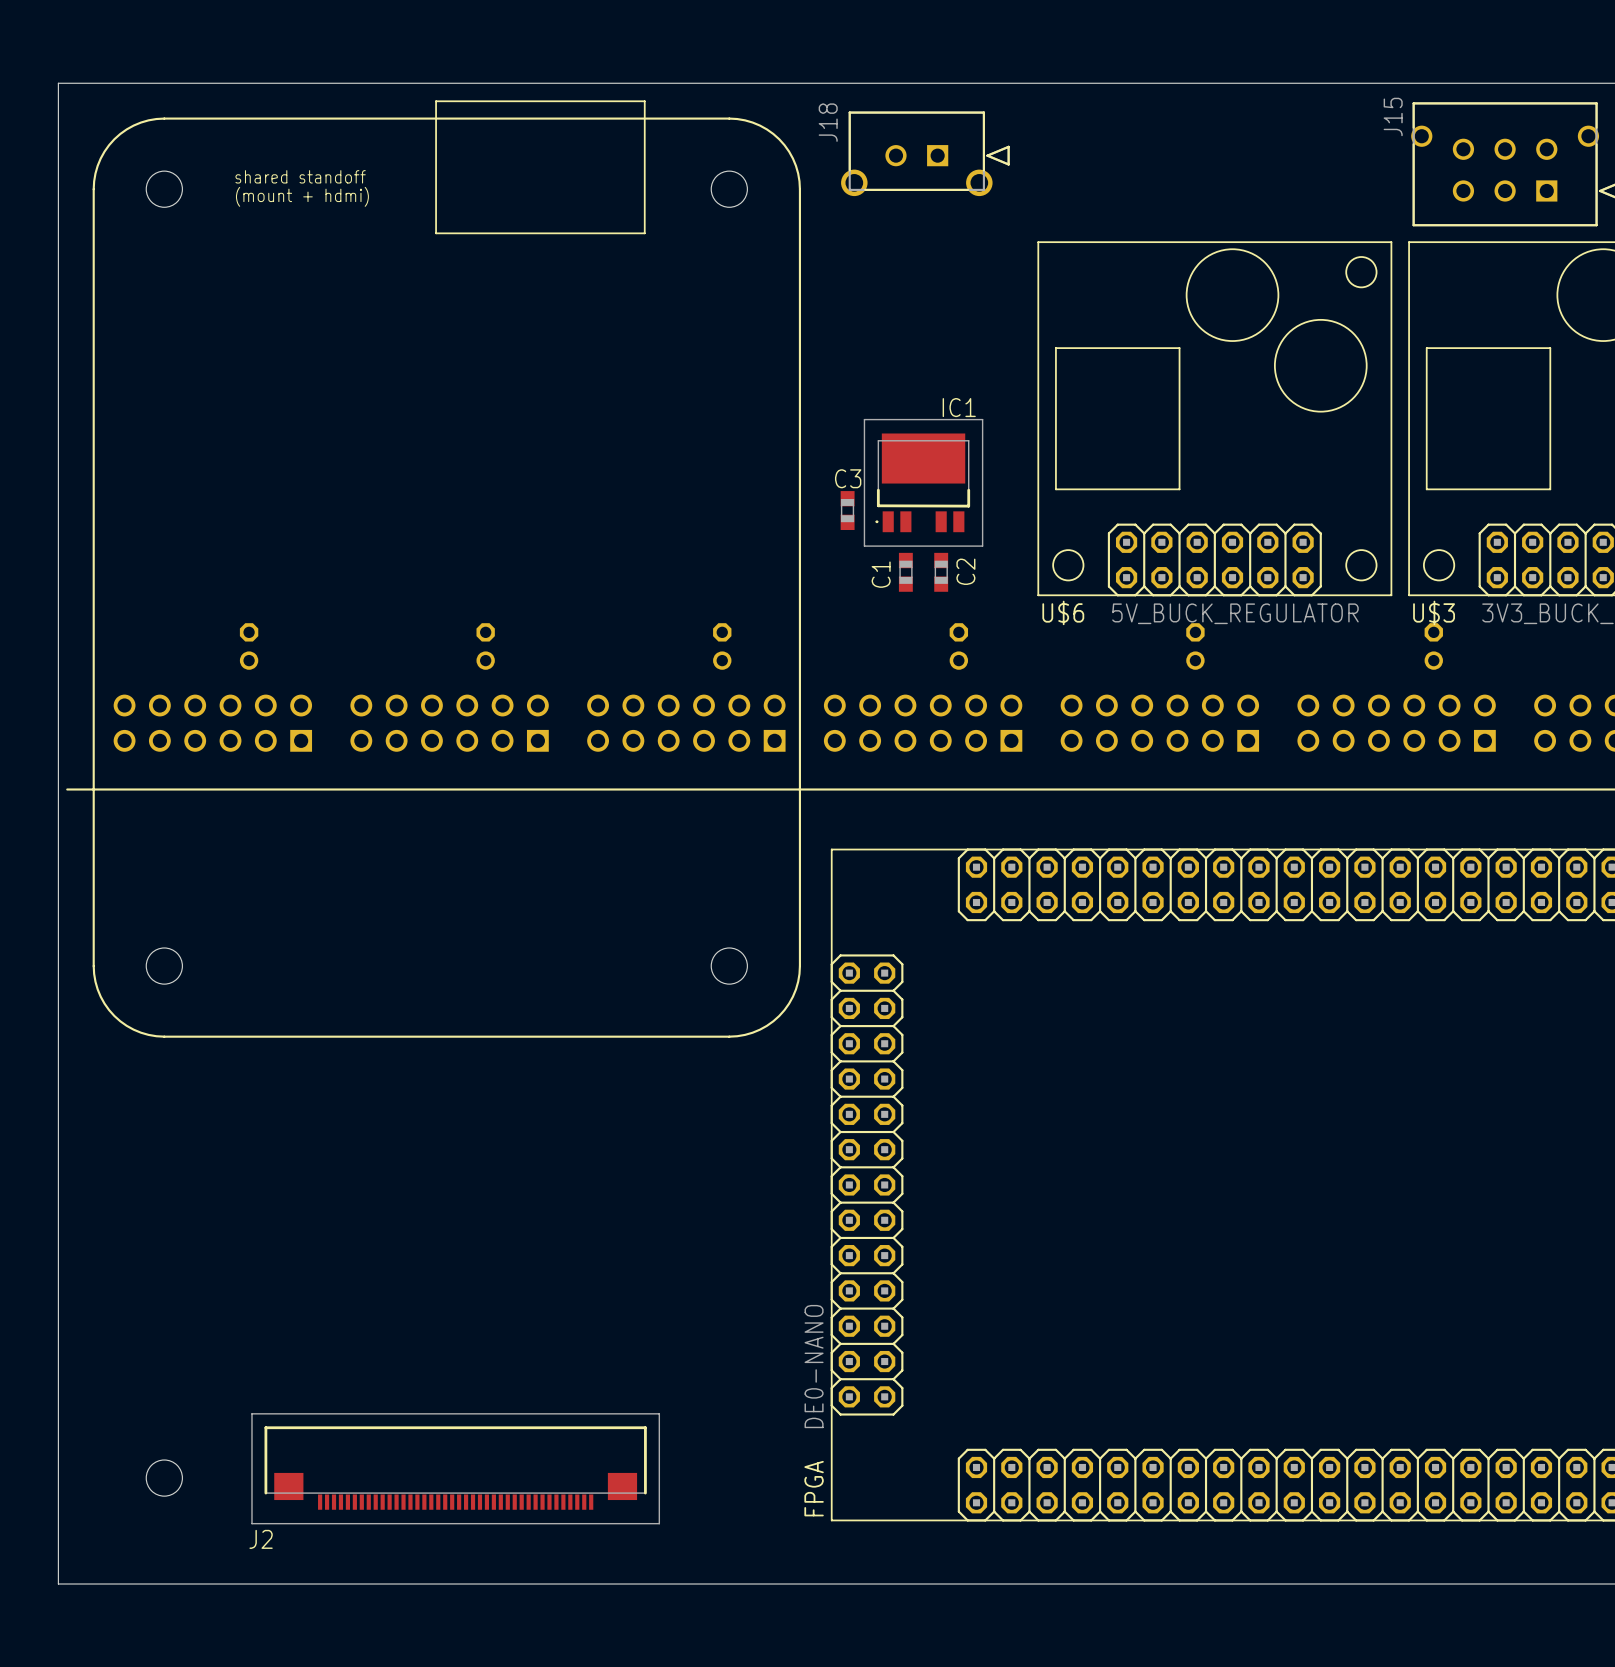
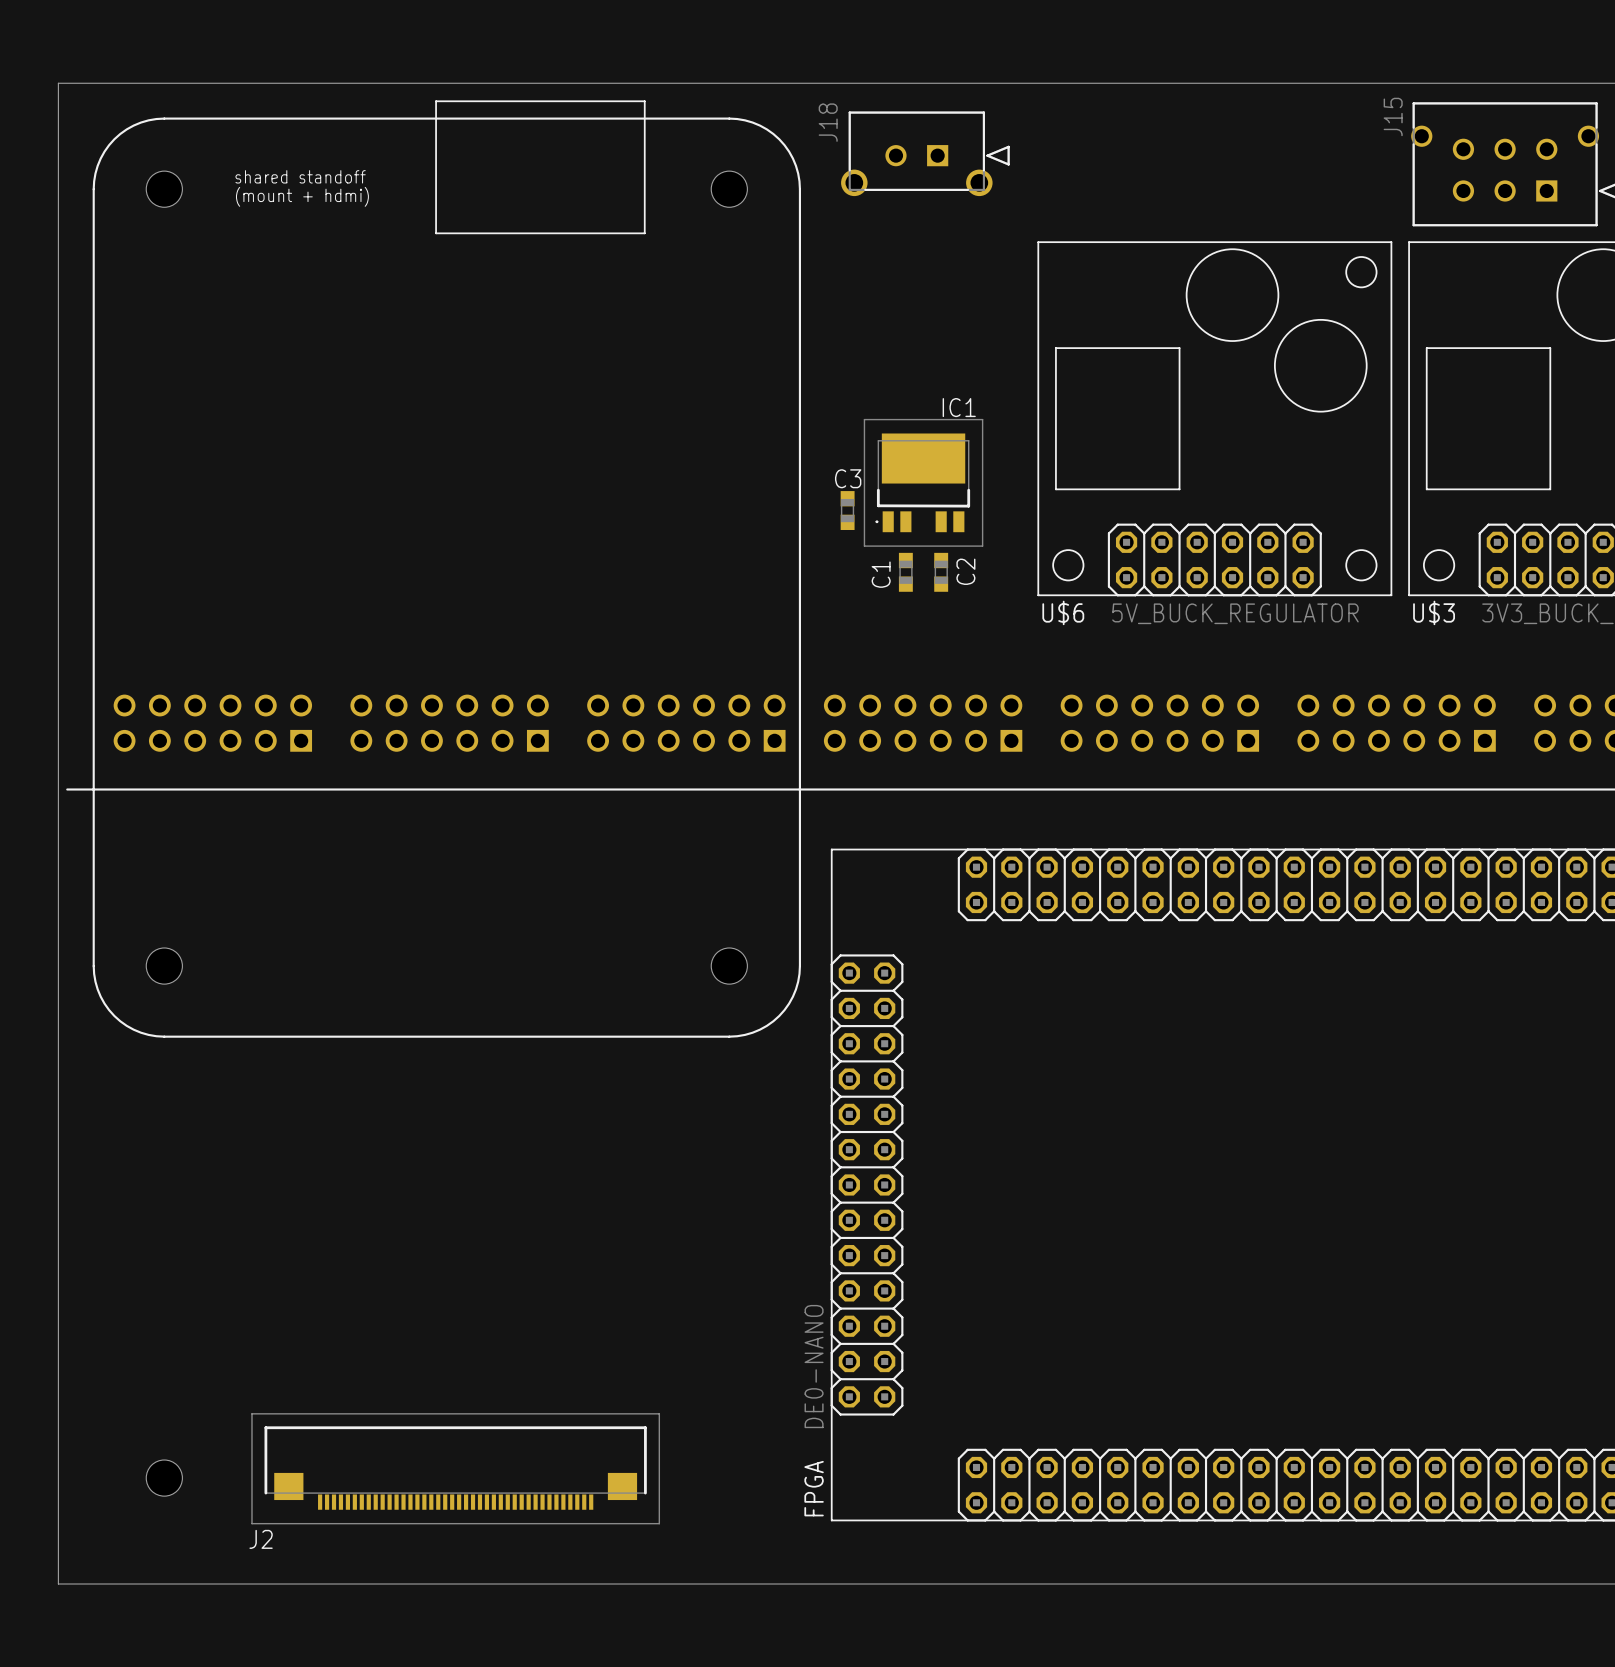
part: (249, 646) -> none
part: (485, 646) -> none
part: (722, 646) -> none
part: (958, 646) -> none
part: (1195, 646) -> none
part: (1433, 646) -> none

